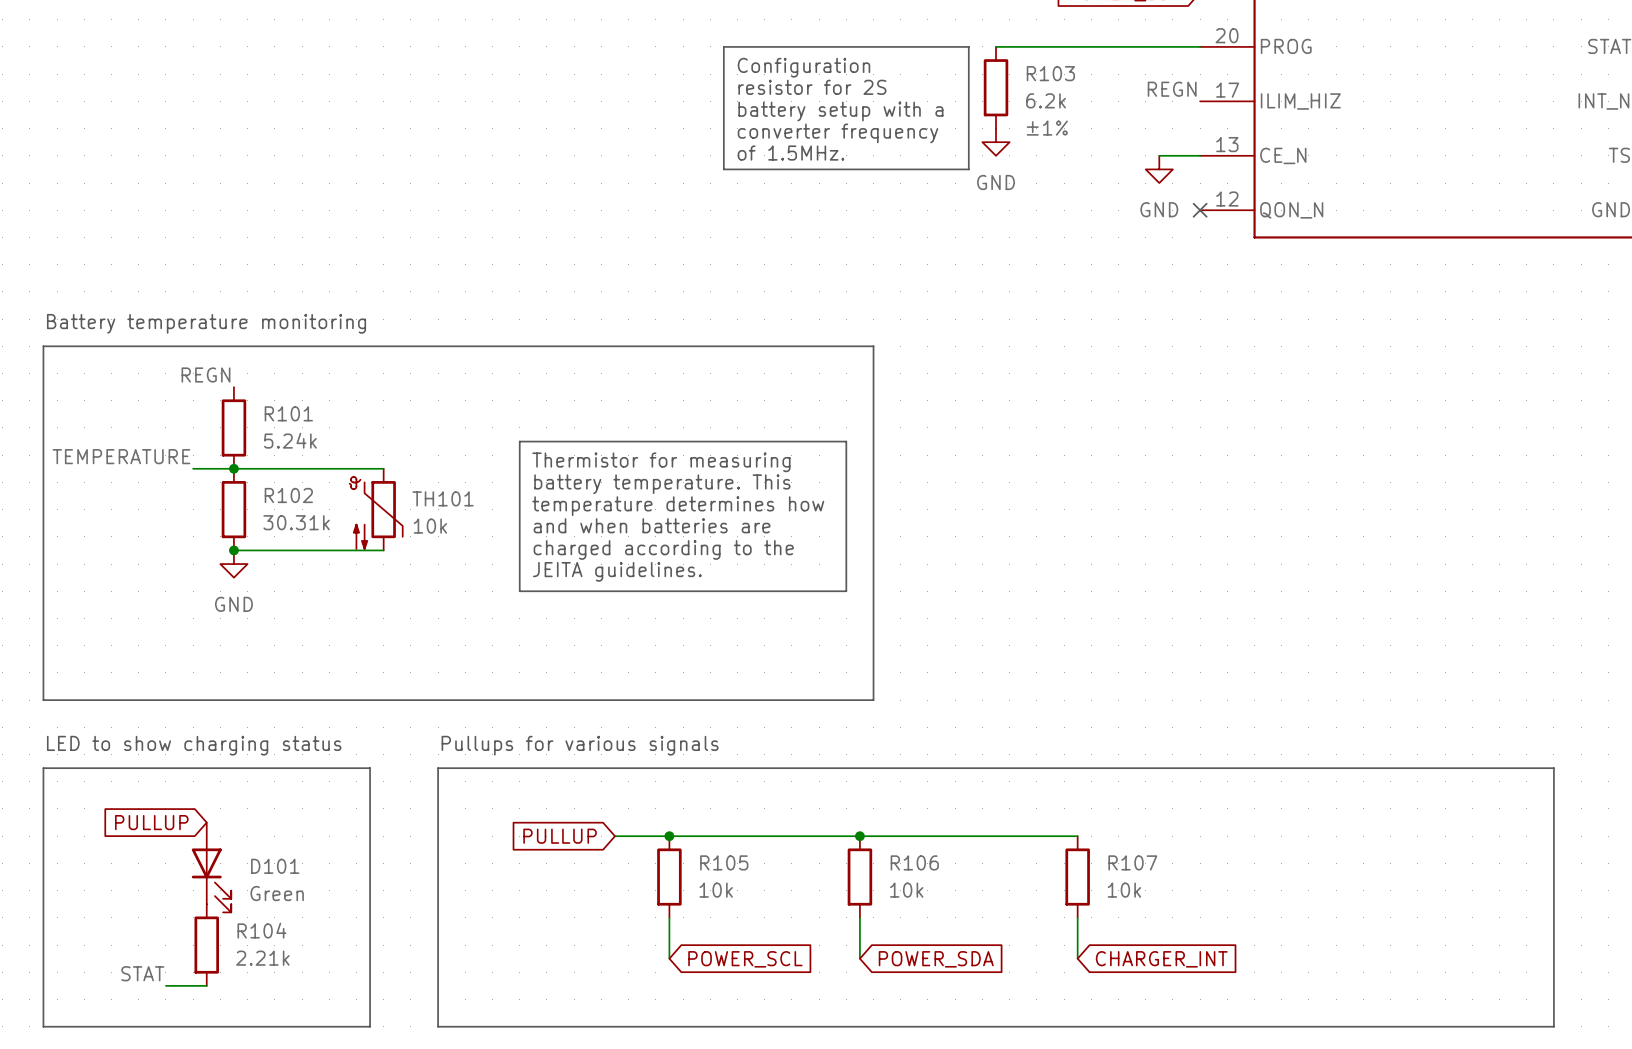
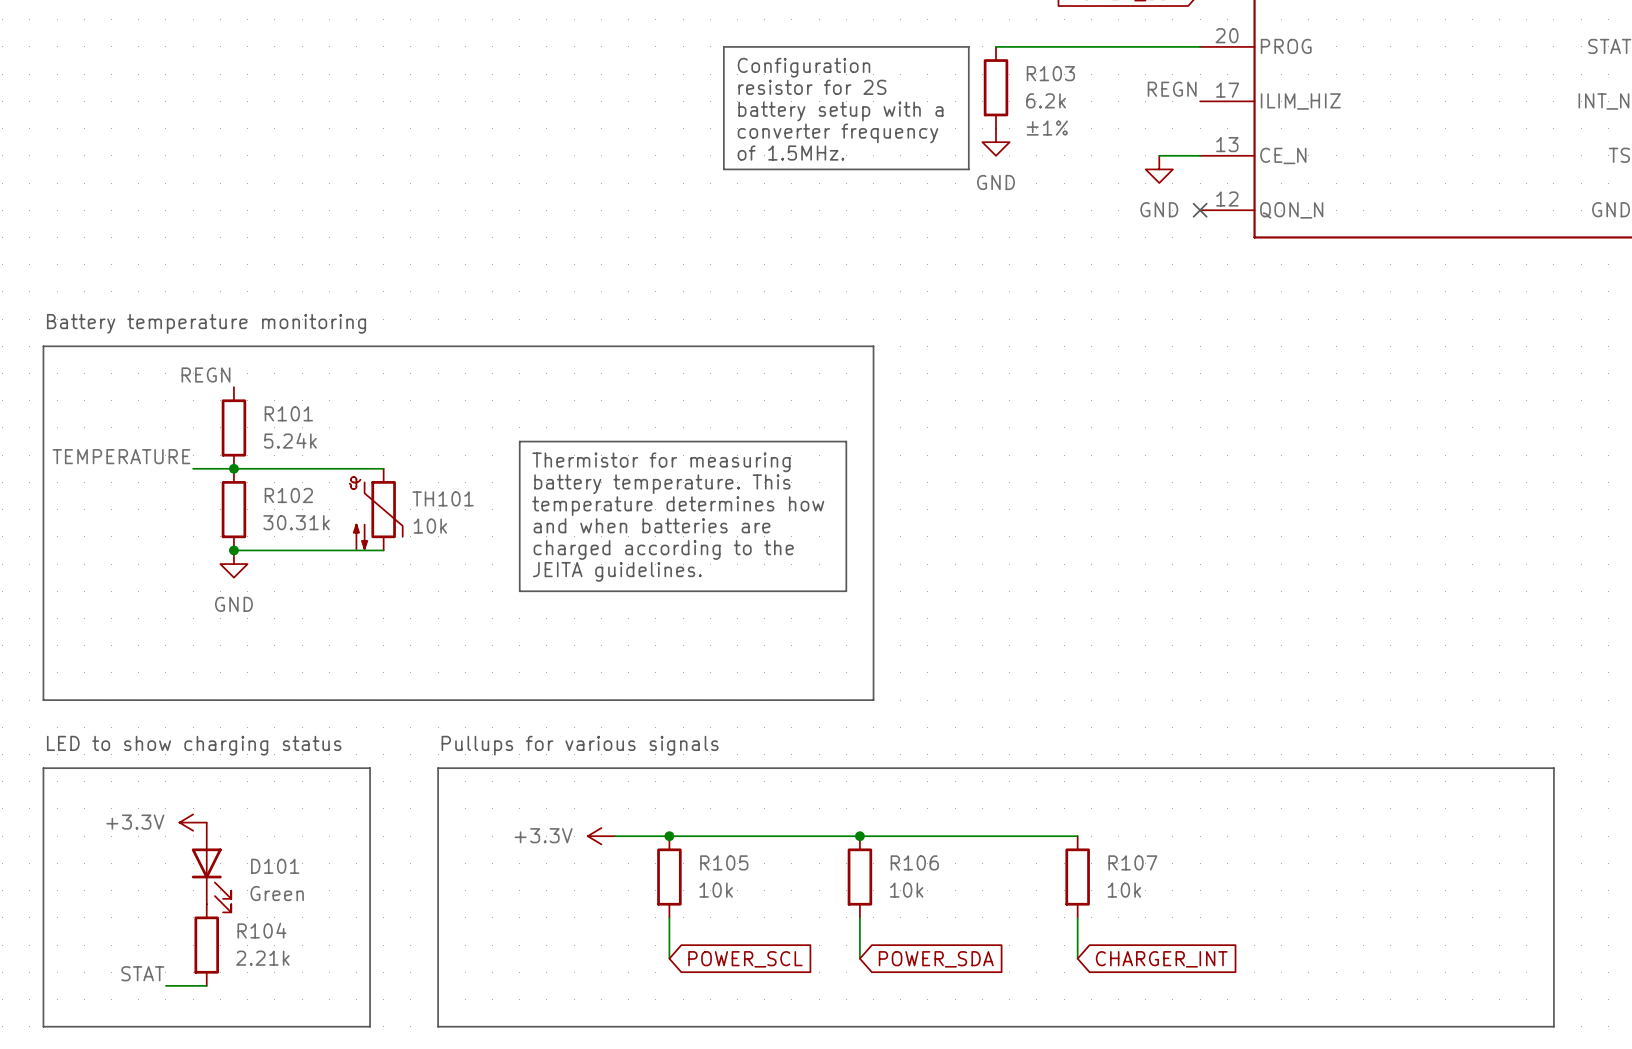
global label: PULLUP (151, 822) -> none
power symbol: none -> +3.3V (193, 822)
global label: PULLUP (560, 836) -> none
power symbol: none -> +3.3V (601, 836)

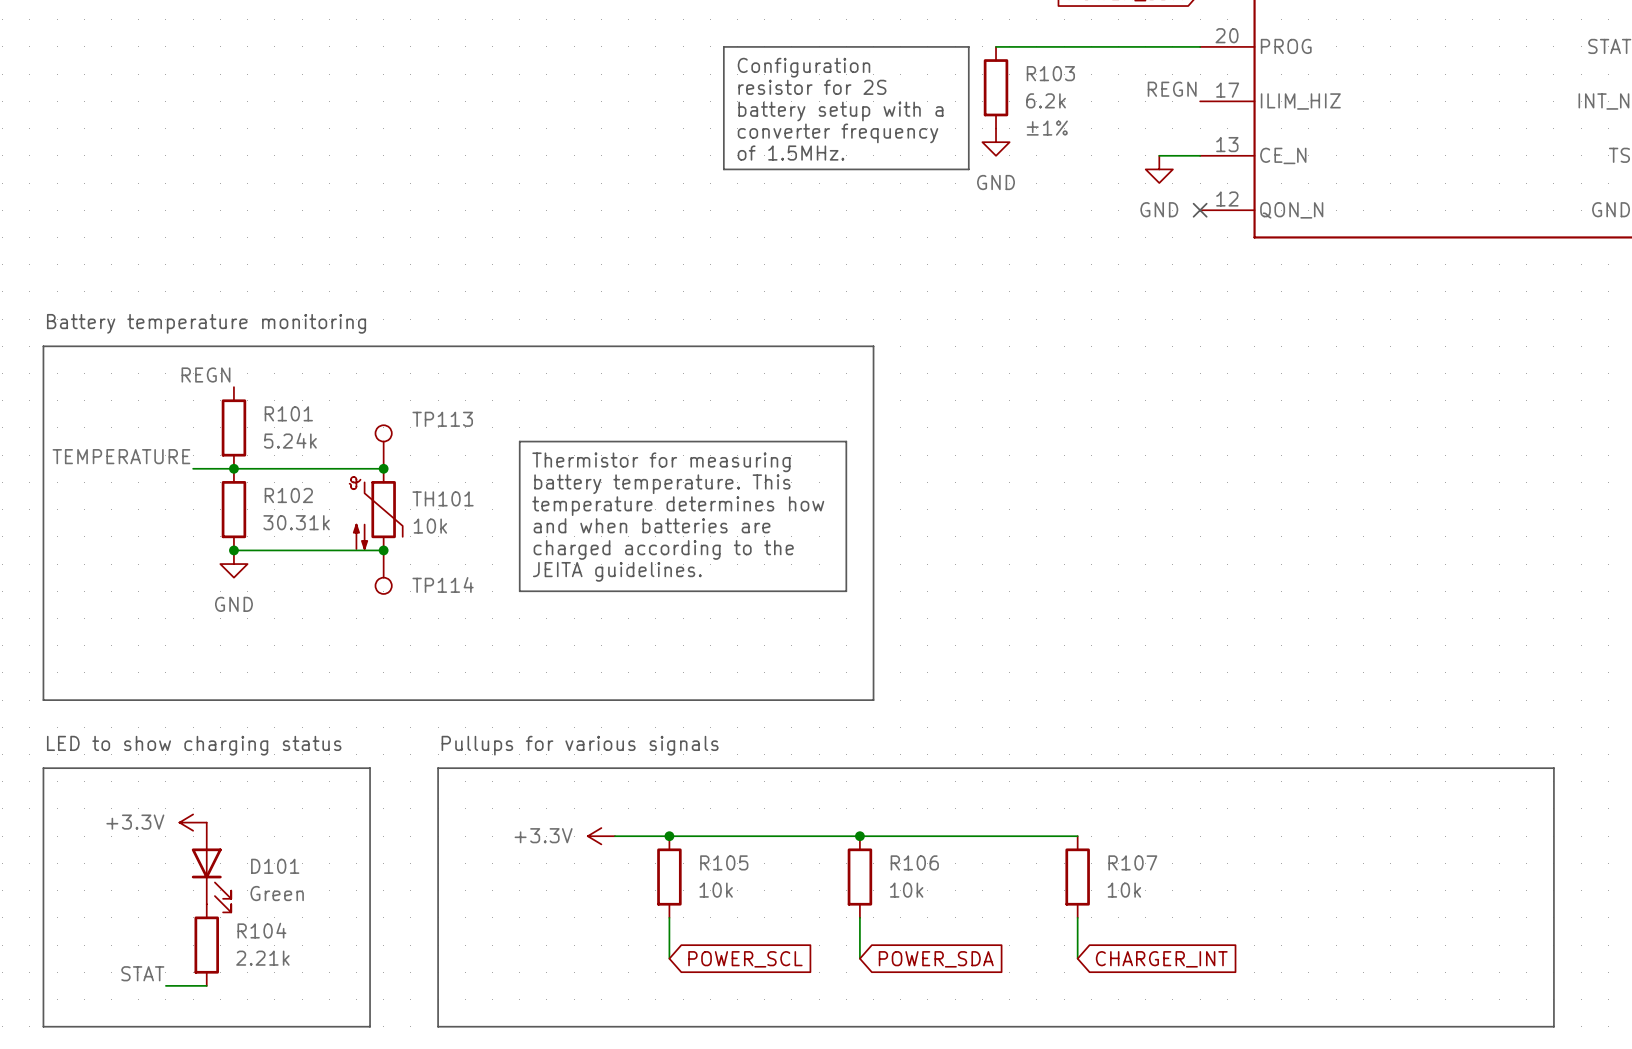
TP113: none -> (383, 447)
junction: none -> (383, 468)
junction: none -> (383, 550)
TP114: none -> (383, 572)

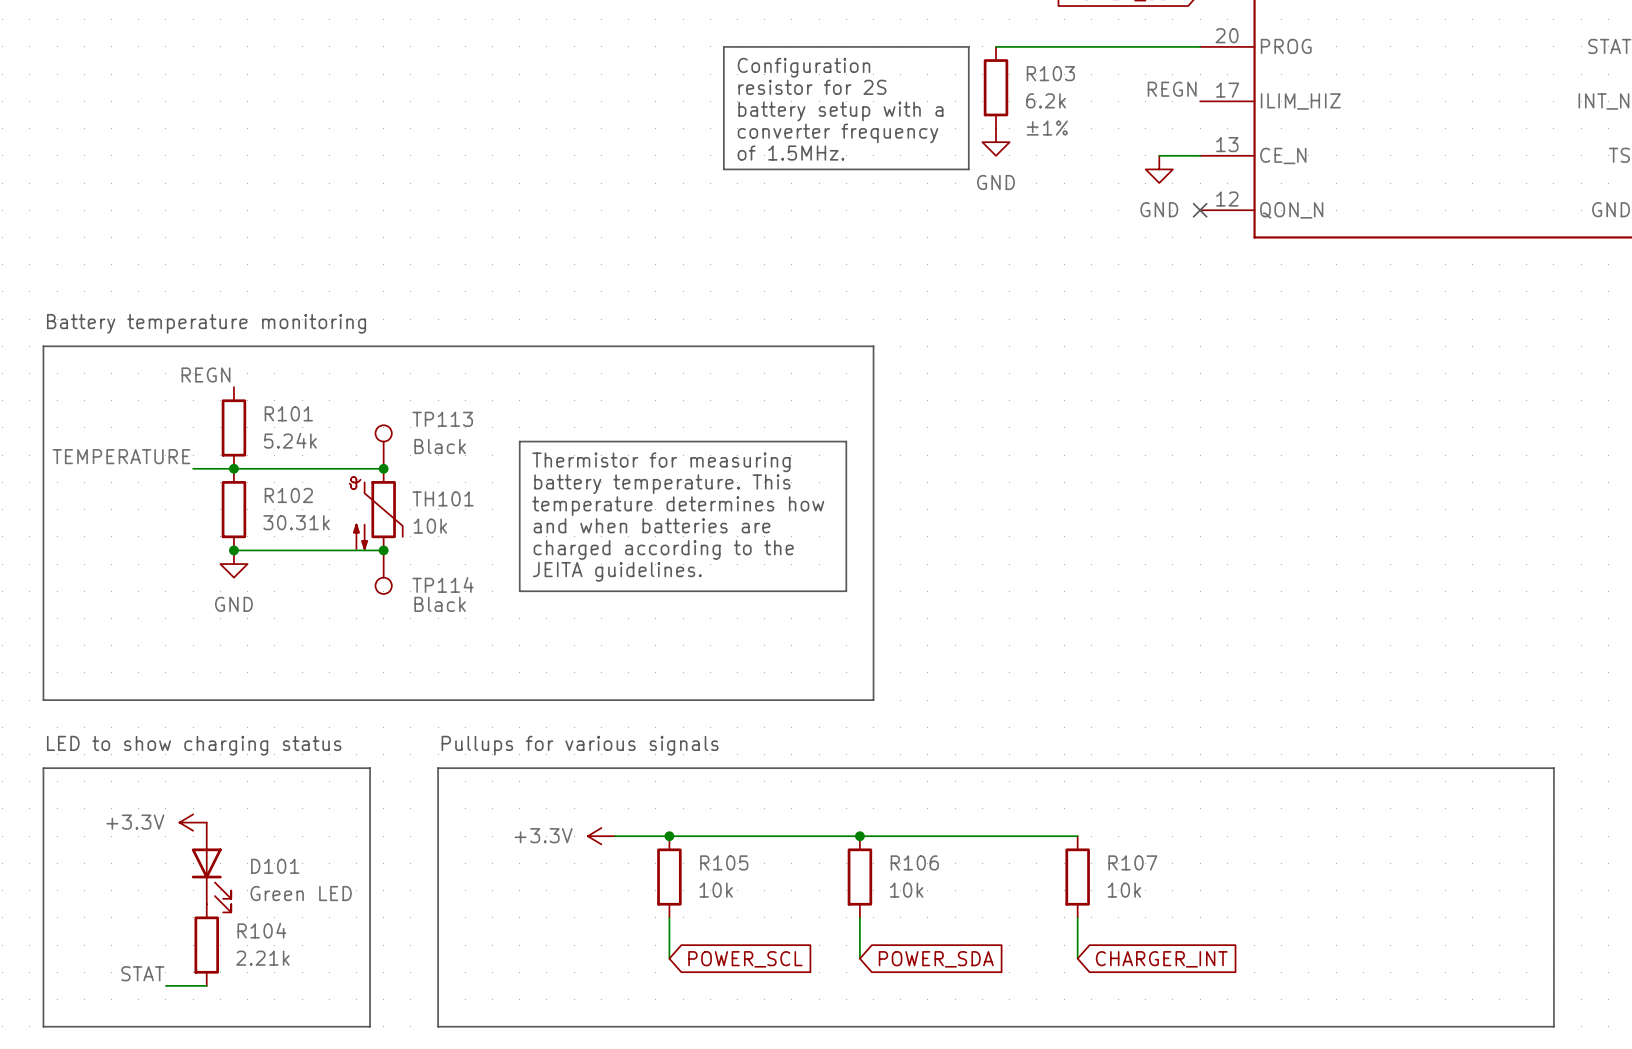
TP113 value: none -> Black (440, 446)
TP114 value: none -> Black (440, 604)
D101 value: Green (277, 893) -> Green LED (301, 893)

